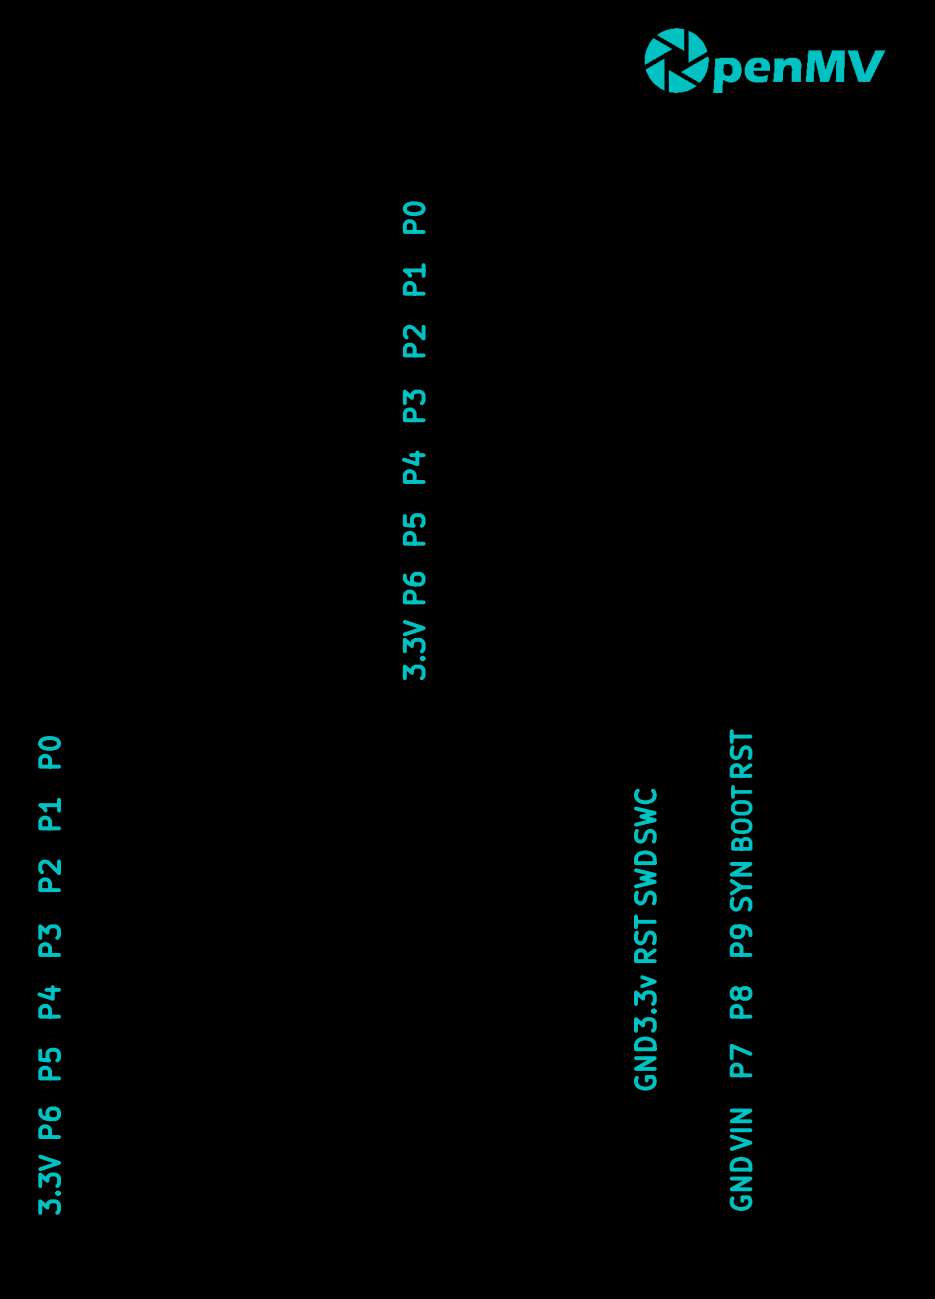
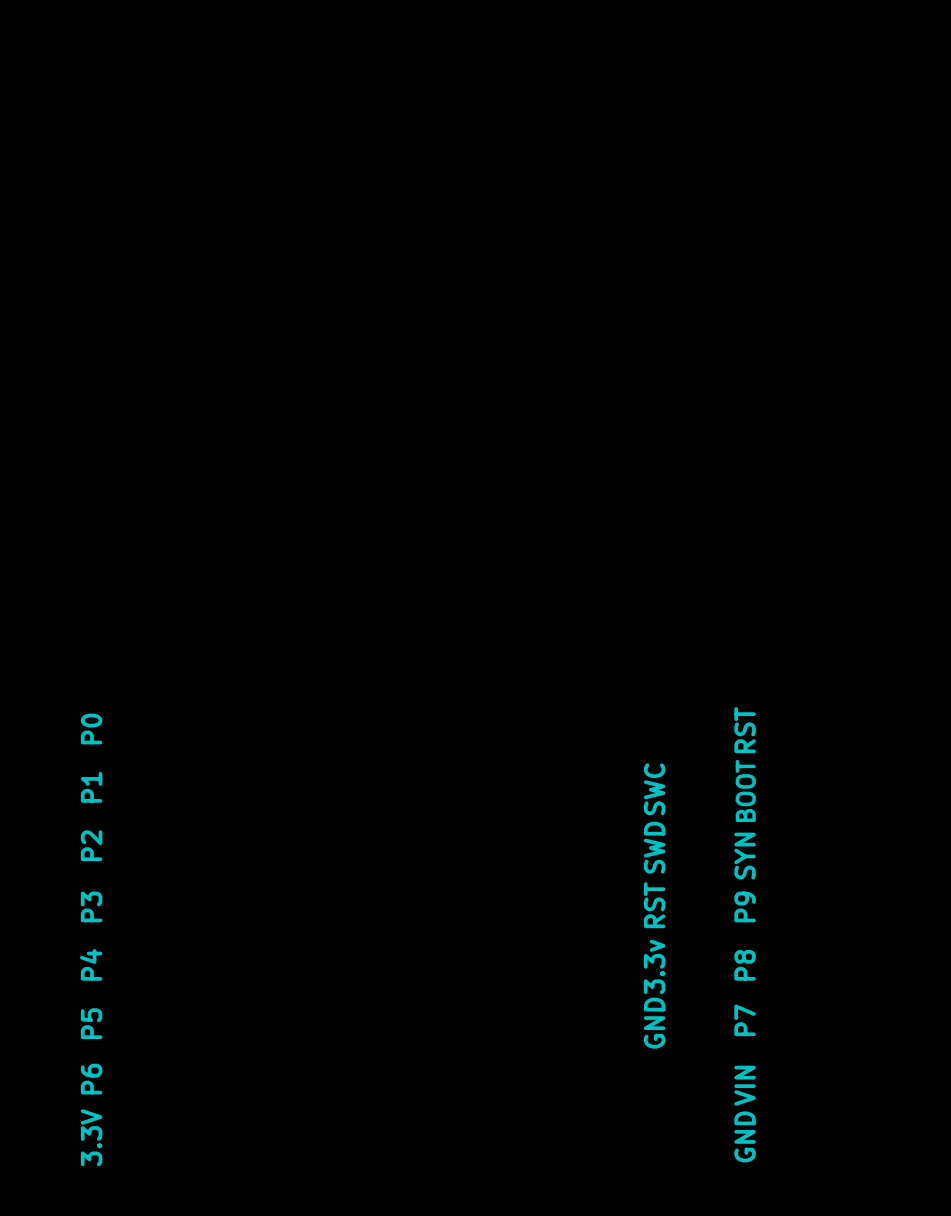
drawing: [644, 28, 886, 94] -> none
text: P0 (414, 217) -> none
text: P1 (414, 279) -> none
text: P2 (414, 341) -> none
text: P3 (414, 405) -> none
text: P4 (413, 467) -> none
text: P5 (414, 529) -> none
text: P6 (414, 588) -> none
text: 3.3V (414, 650) -> none

